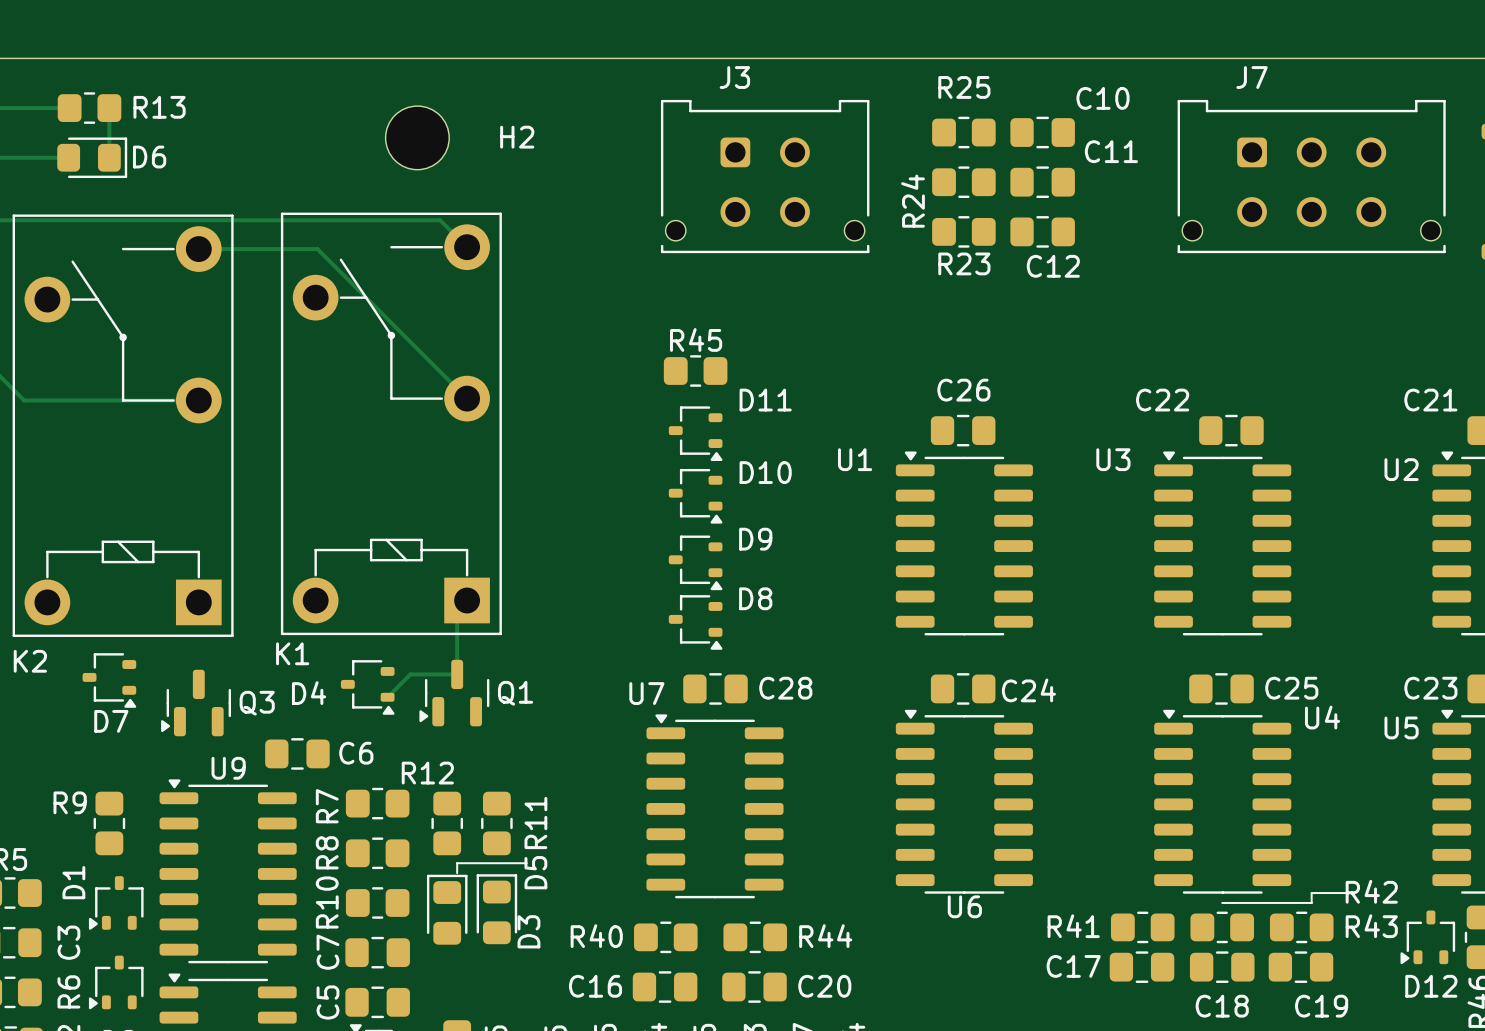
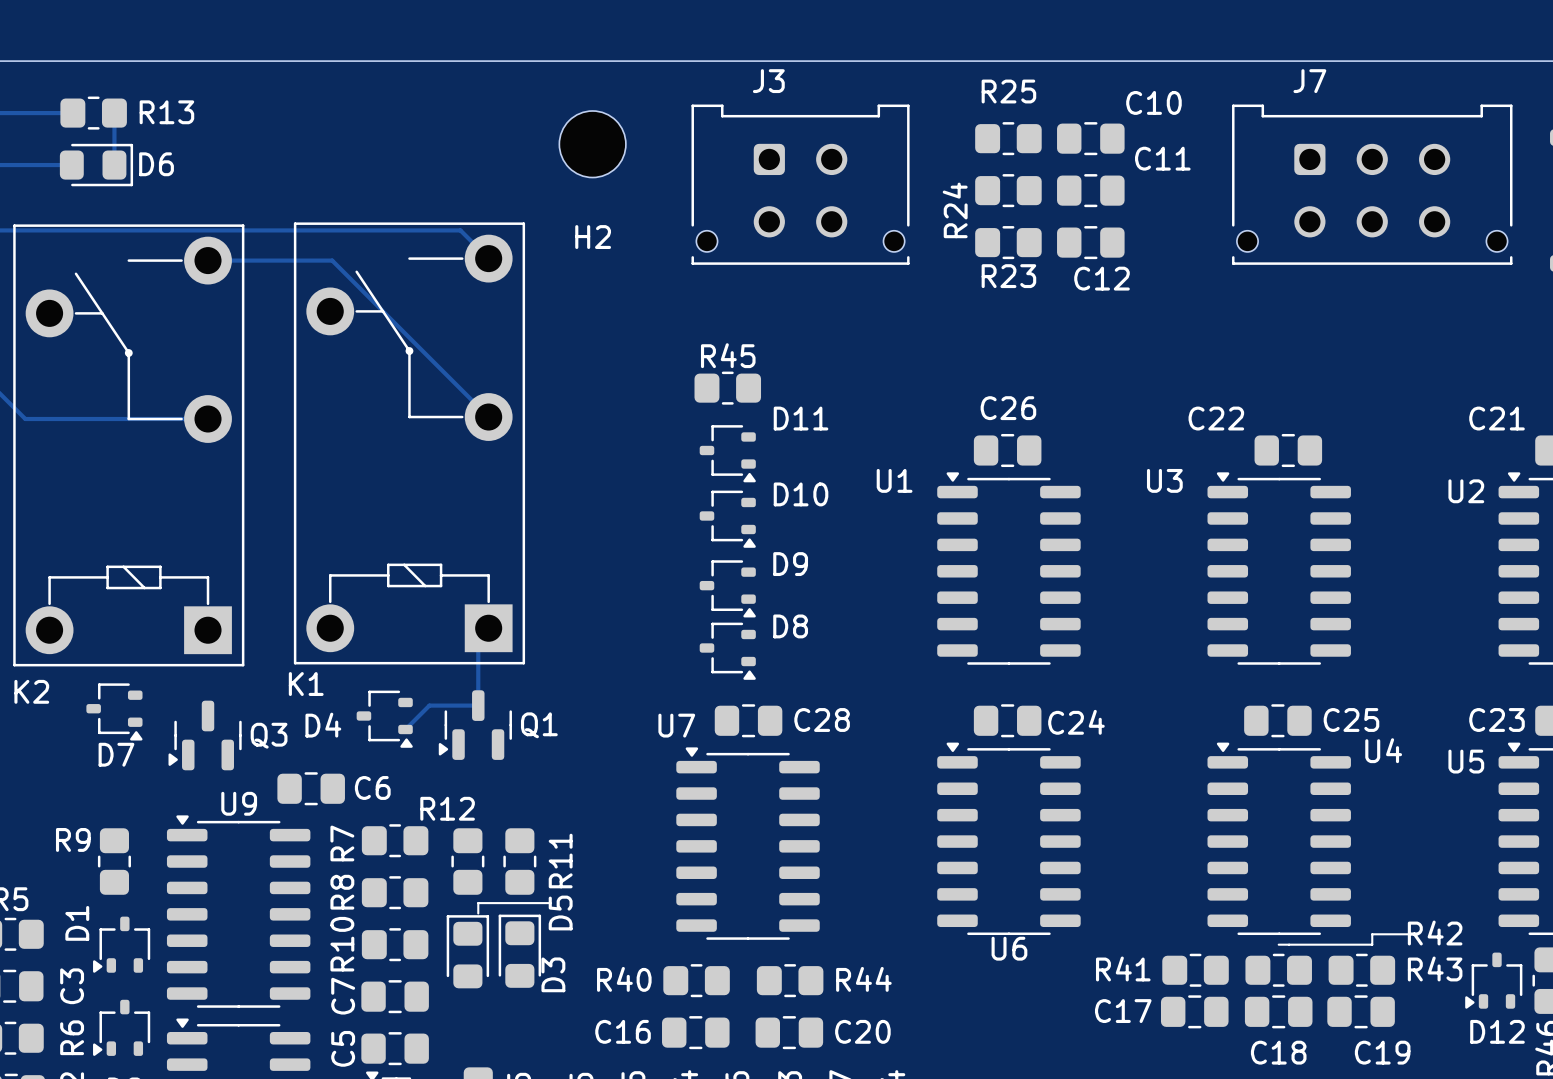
H2 position: (417, 137) -> (592, 144)
H2 name position: H2 (517, 137) -> H2 (593, 237)

